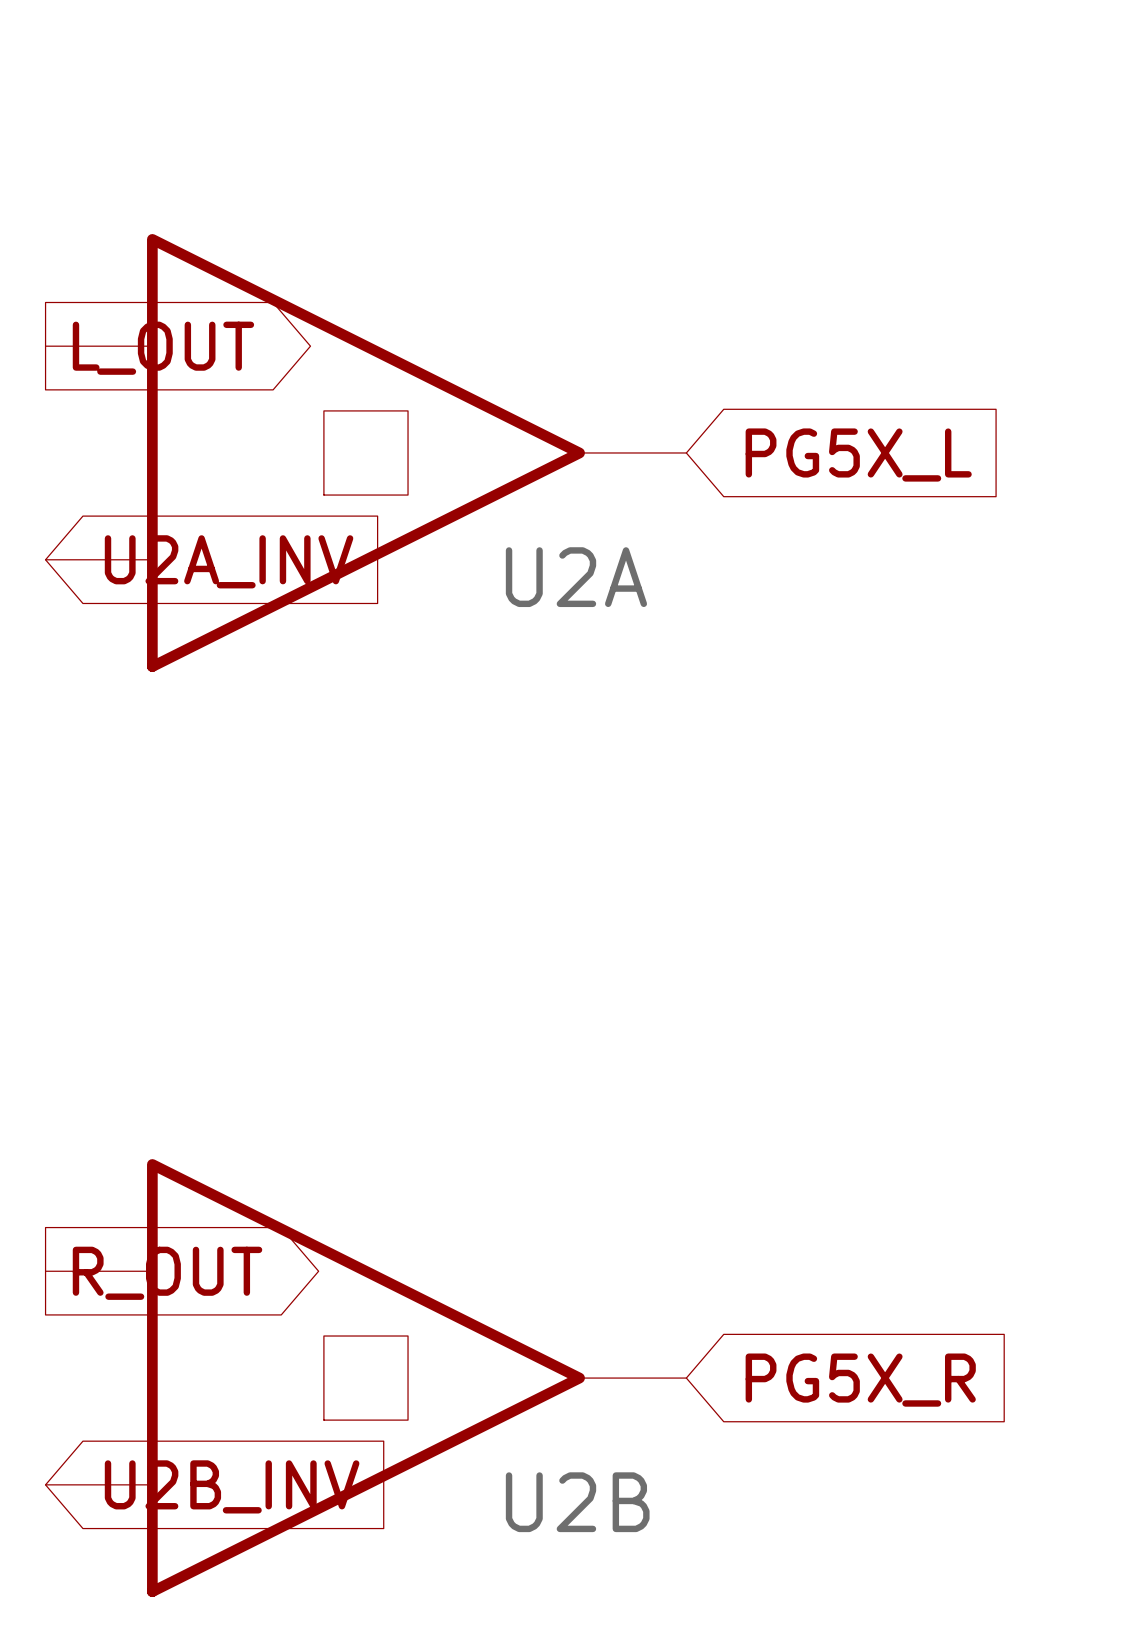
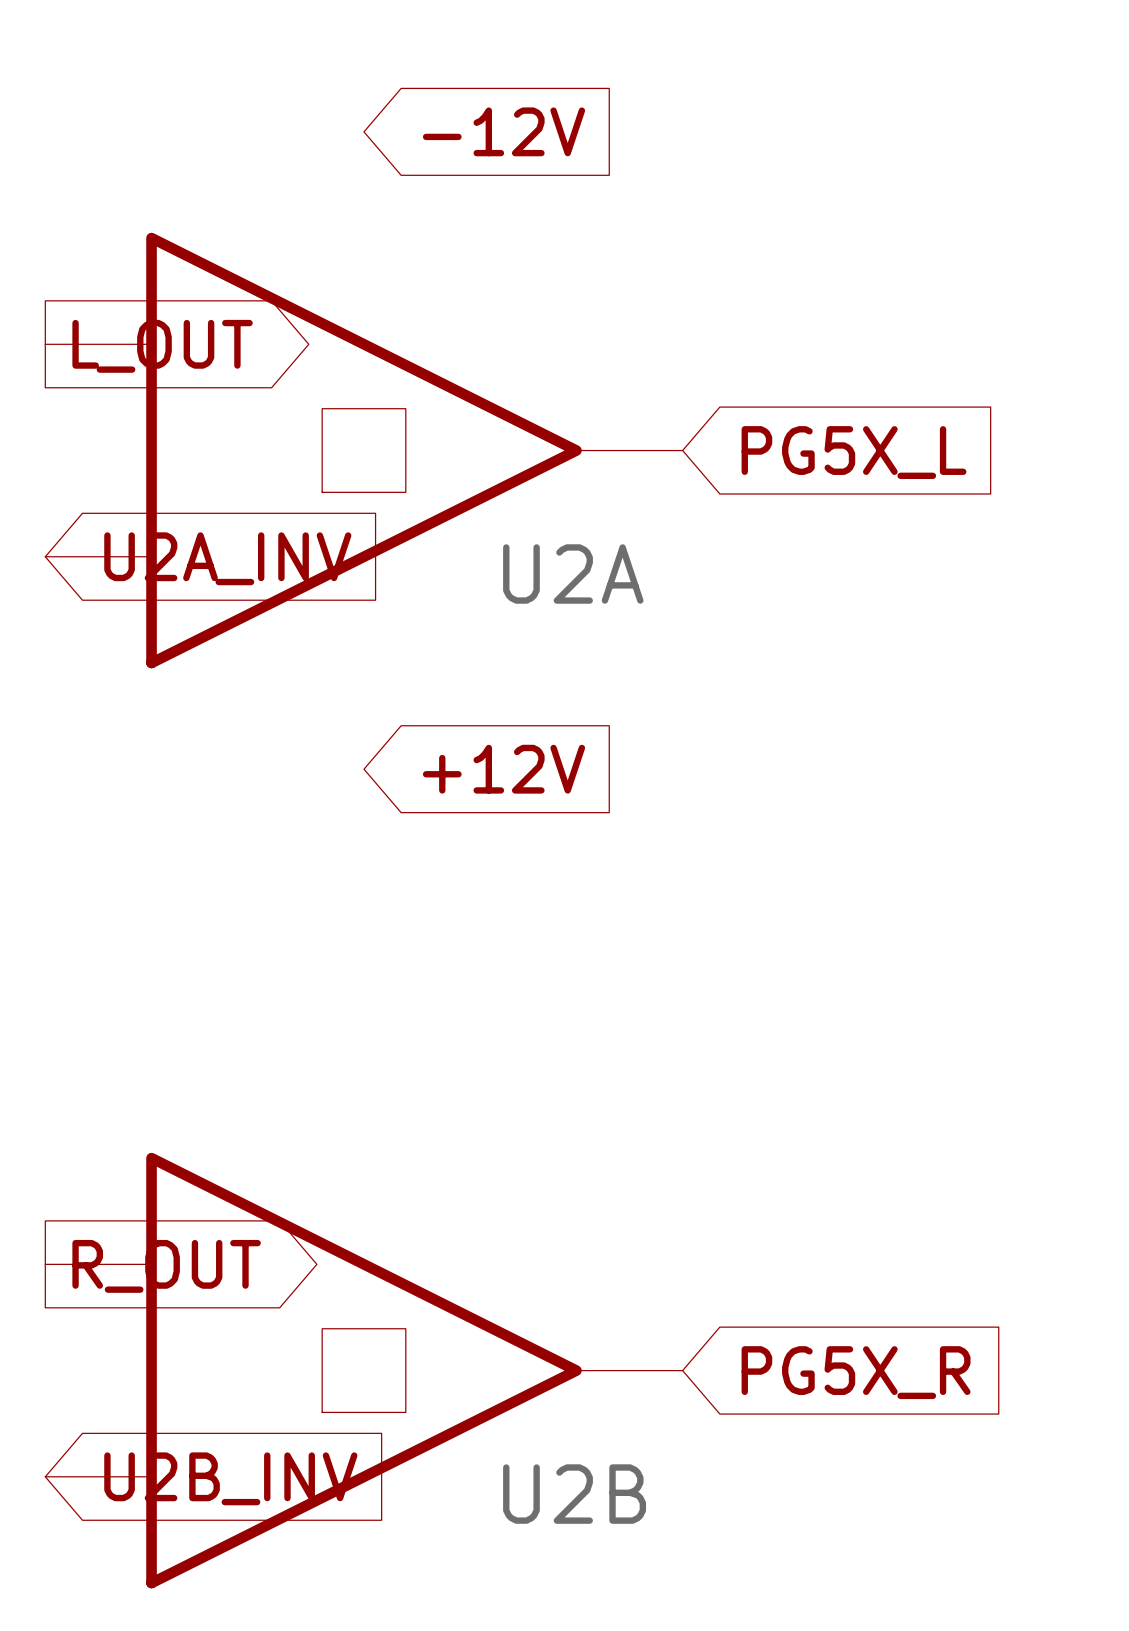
global label: none -> -12V (503, 131)
global label: none -> +12V (503, 769)

